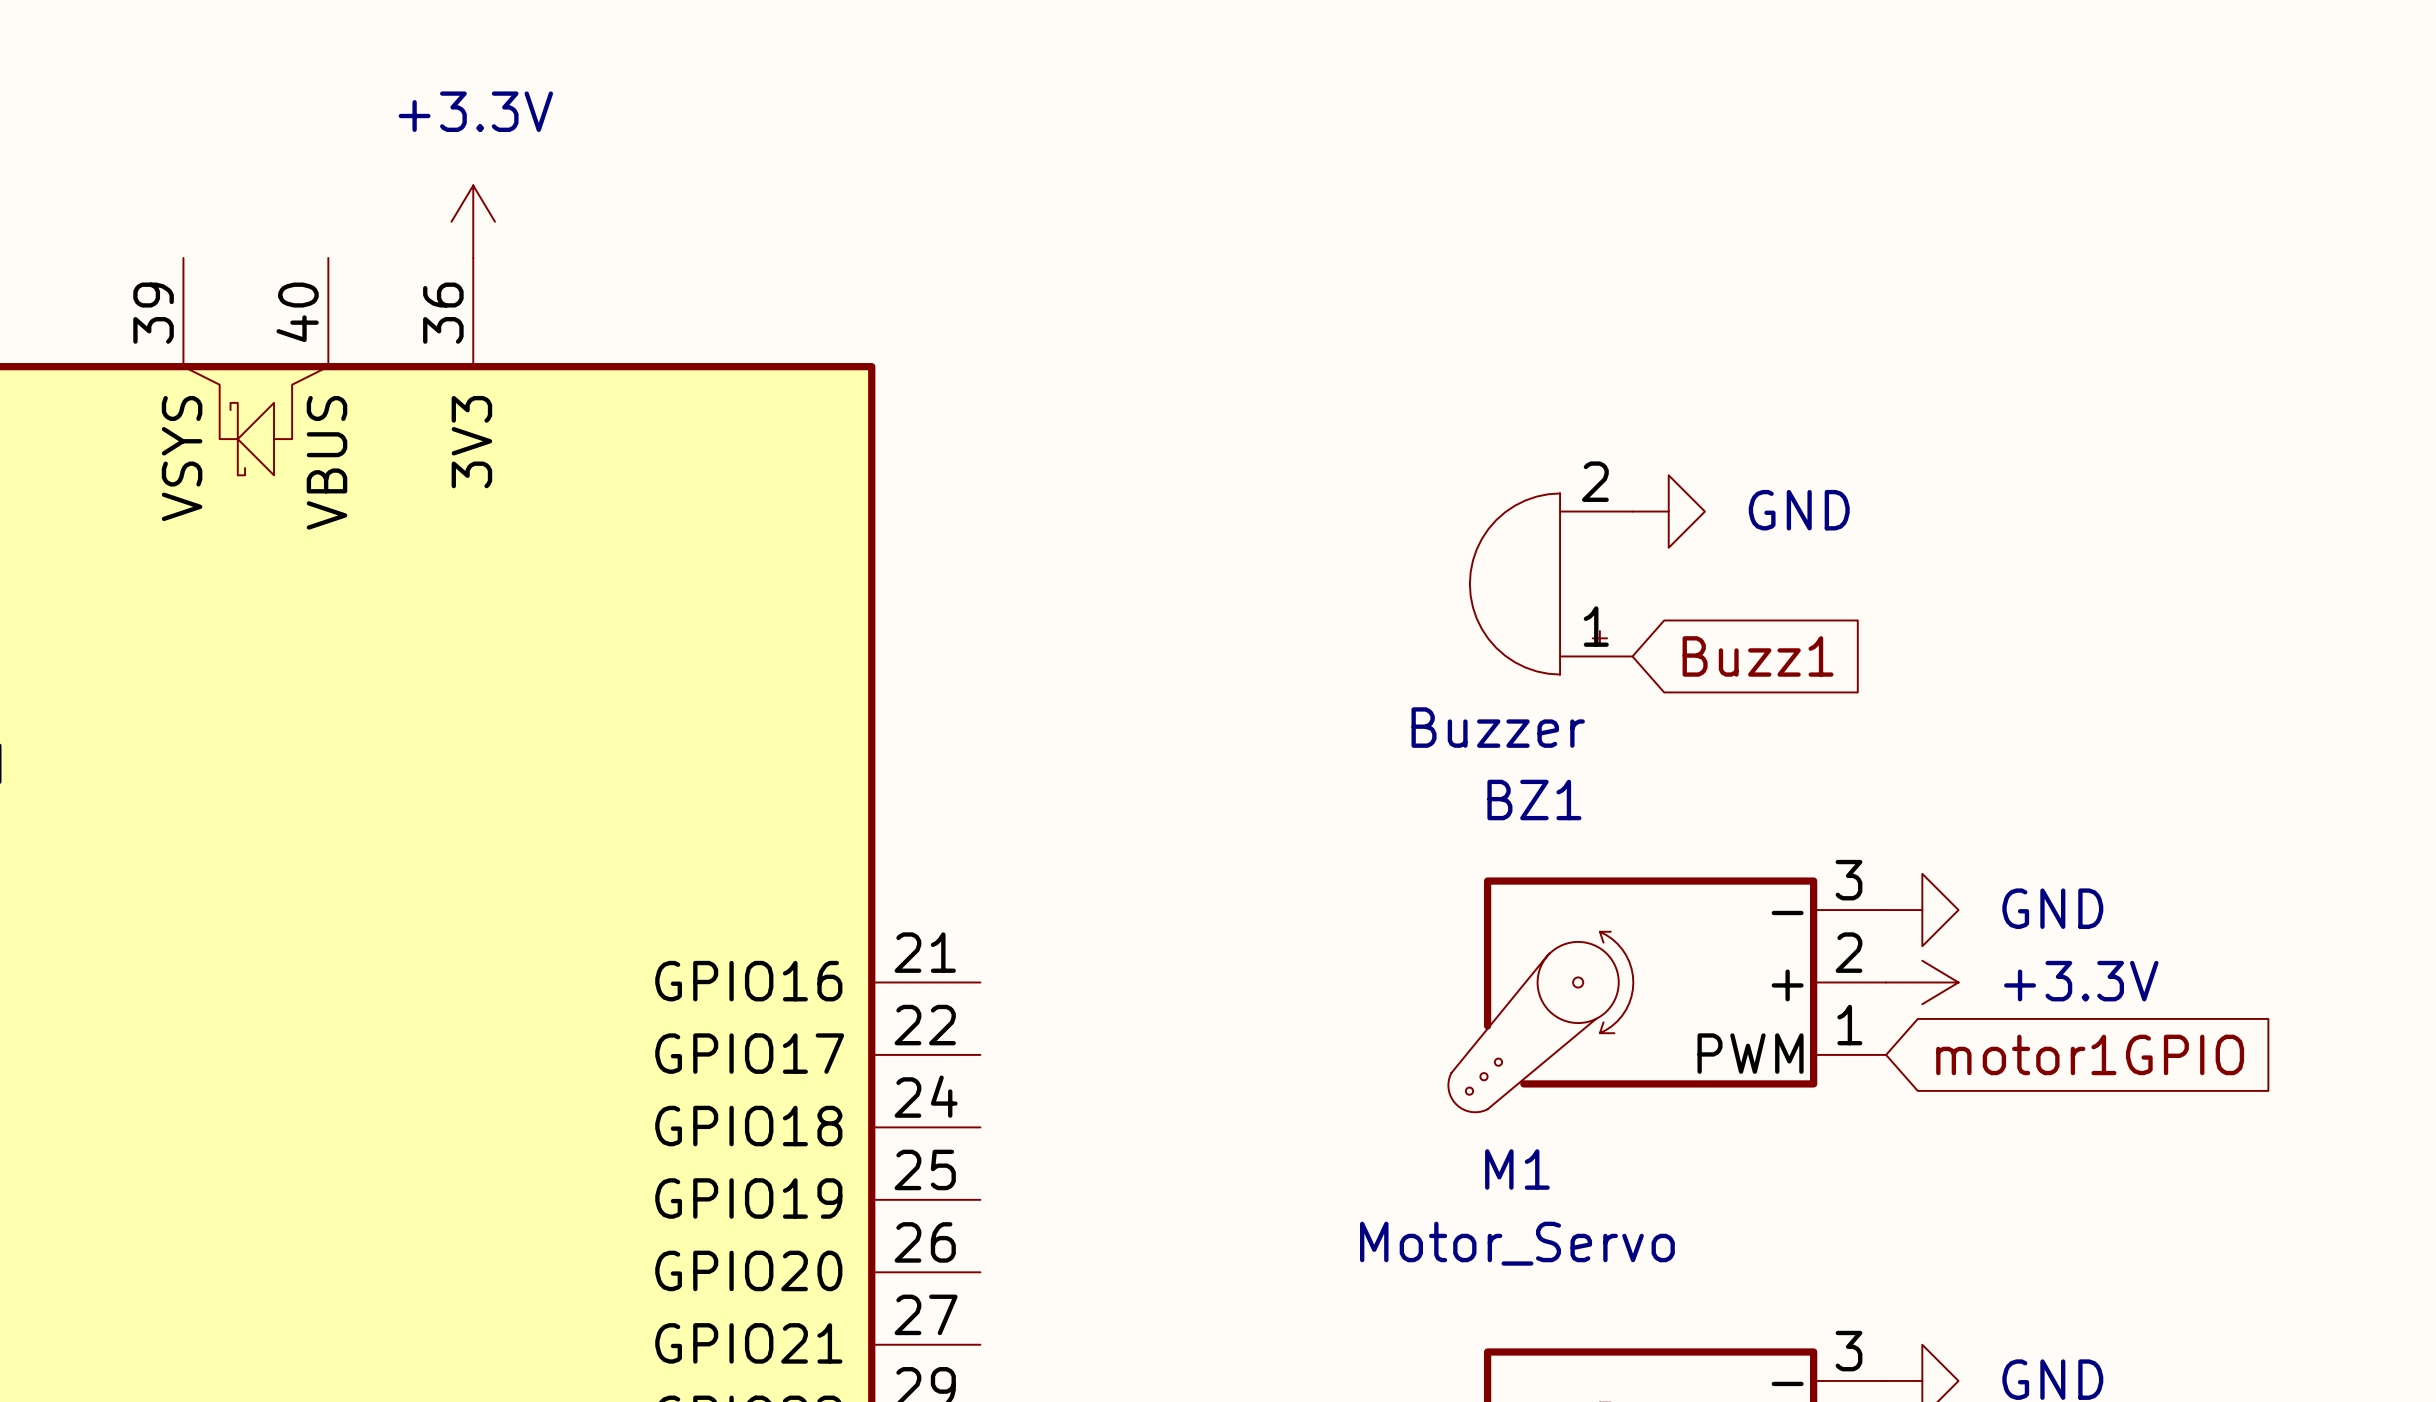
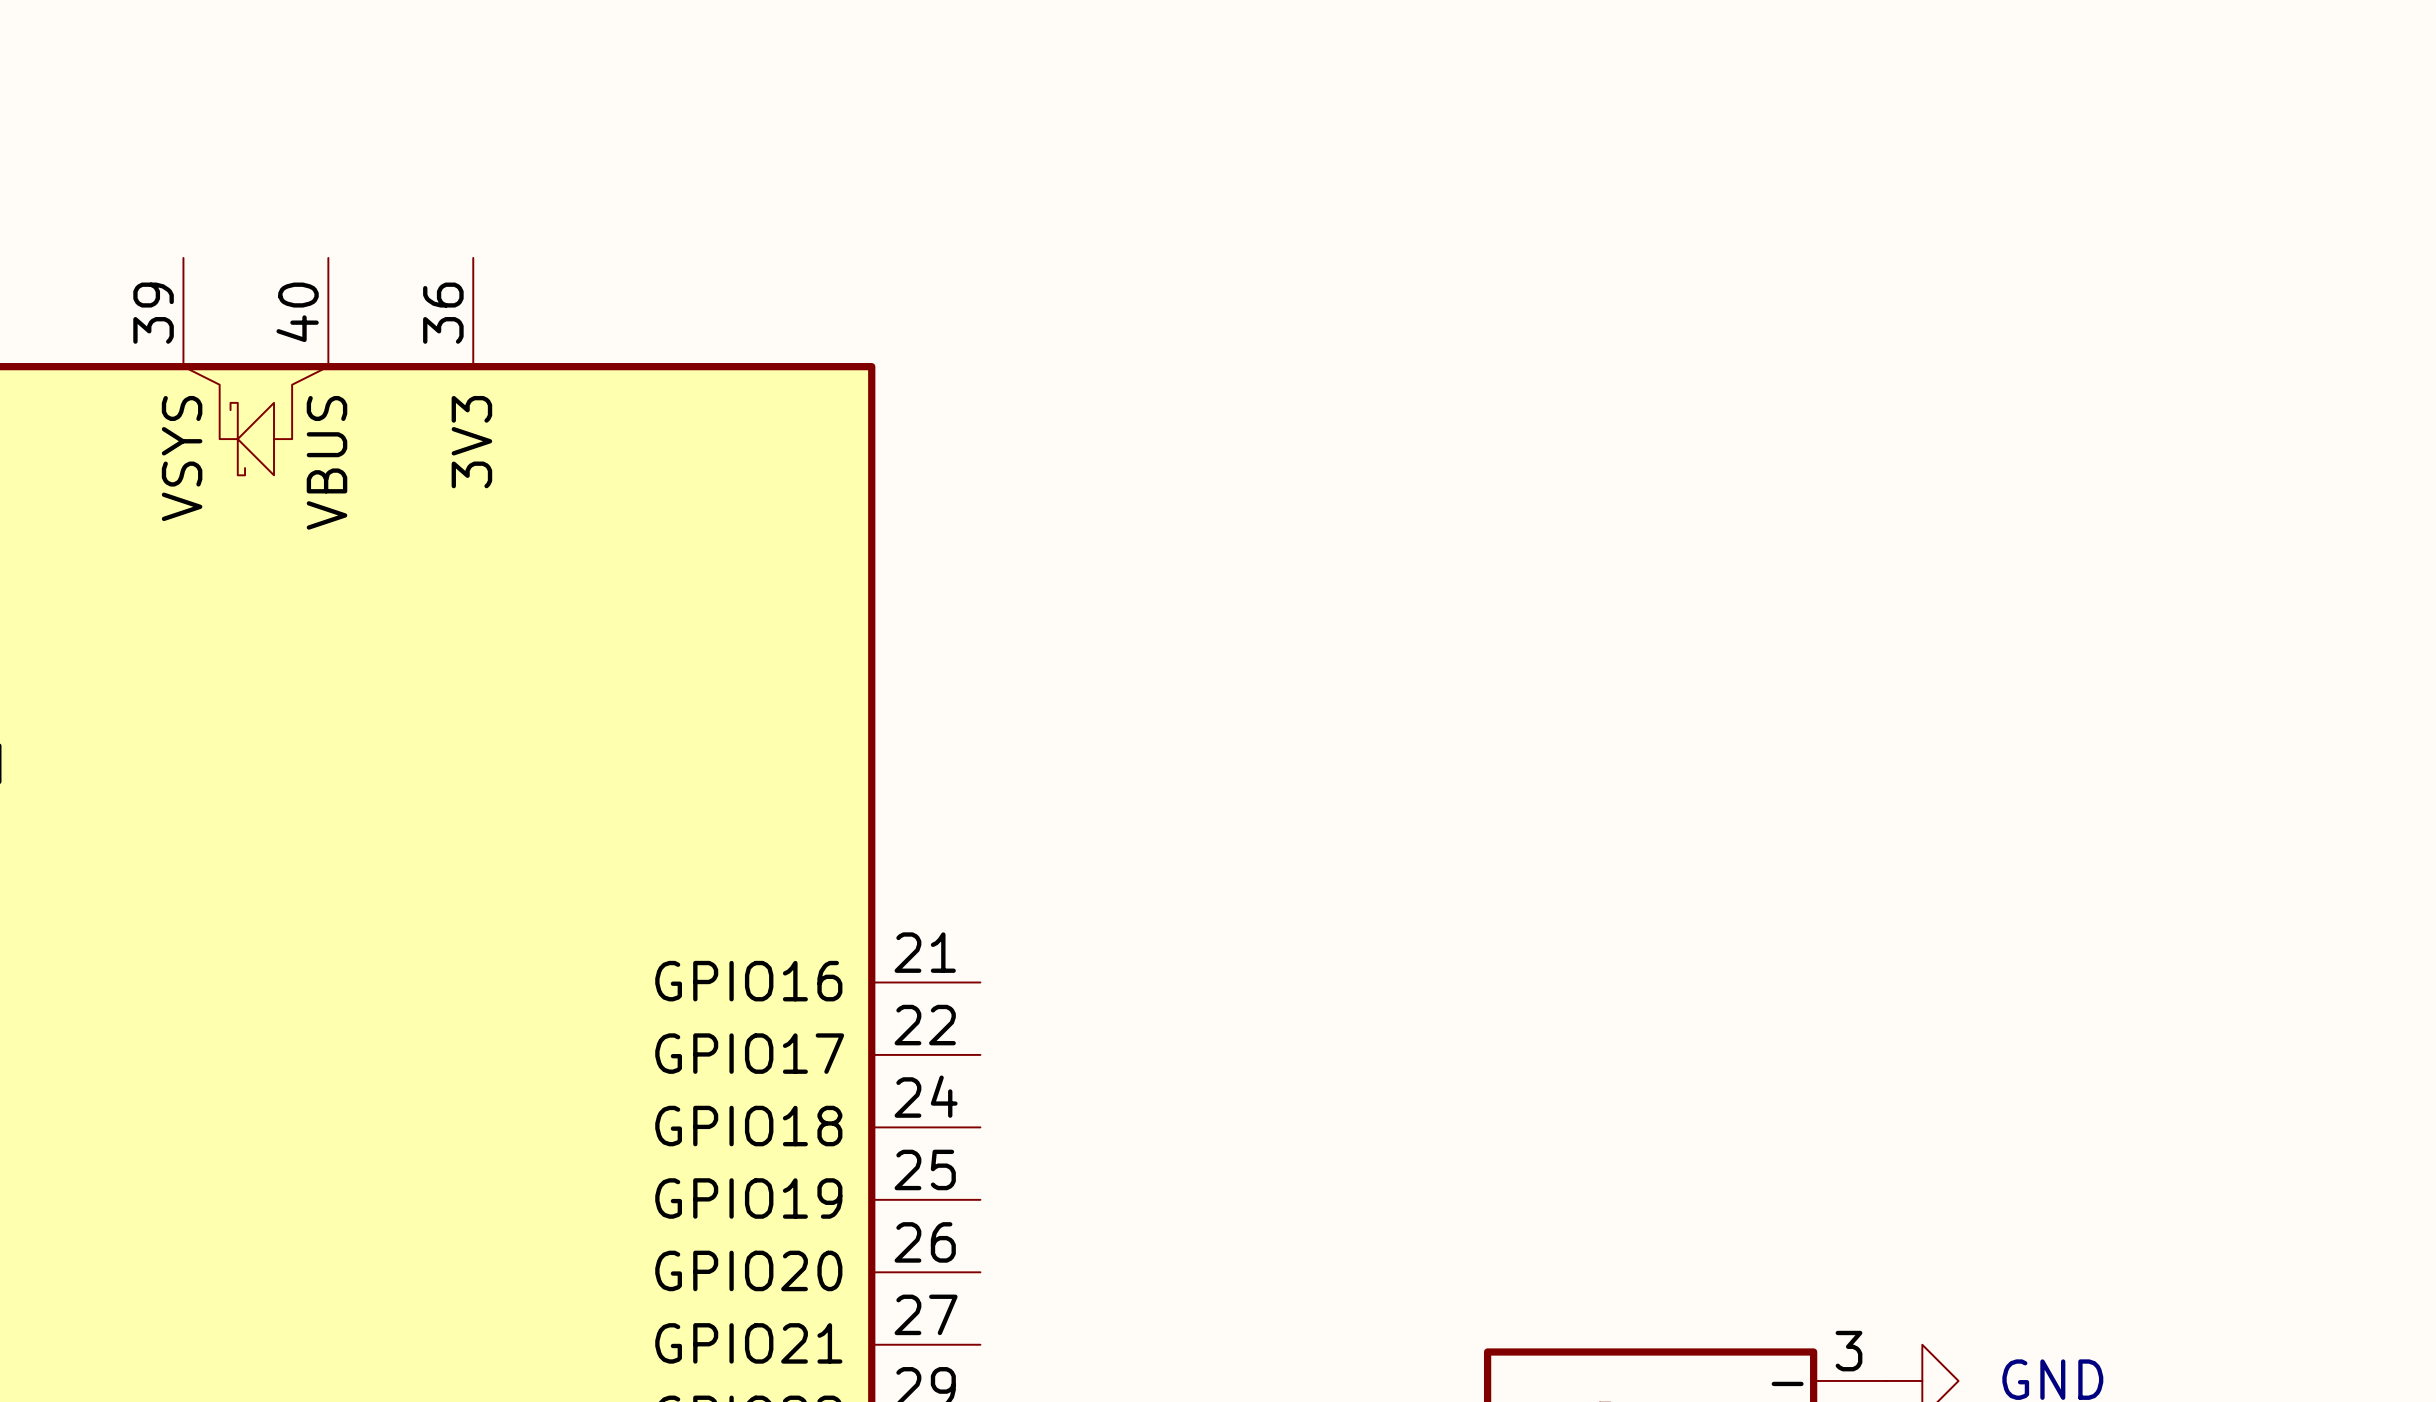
power symbol: +3.3V (473, 221) -> none
power symbol: GND (1668, 511) -> none
BZ1: Buzzer (1551, 584) -> none
global label: Buzz1 (1758, 656) -> none
power symbol: GND (1922, 910) -> none
power symbol: +3.3V (1922, 982) -> none
M1: Motor_Servo (1667, 994) -> none
global label: motor1GPIO (2090, 1054) -> none

